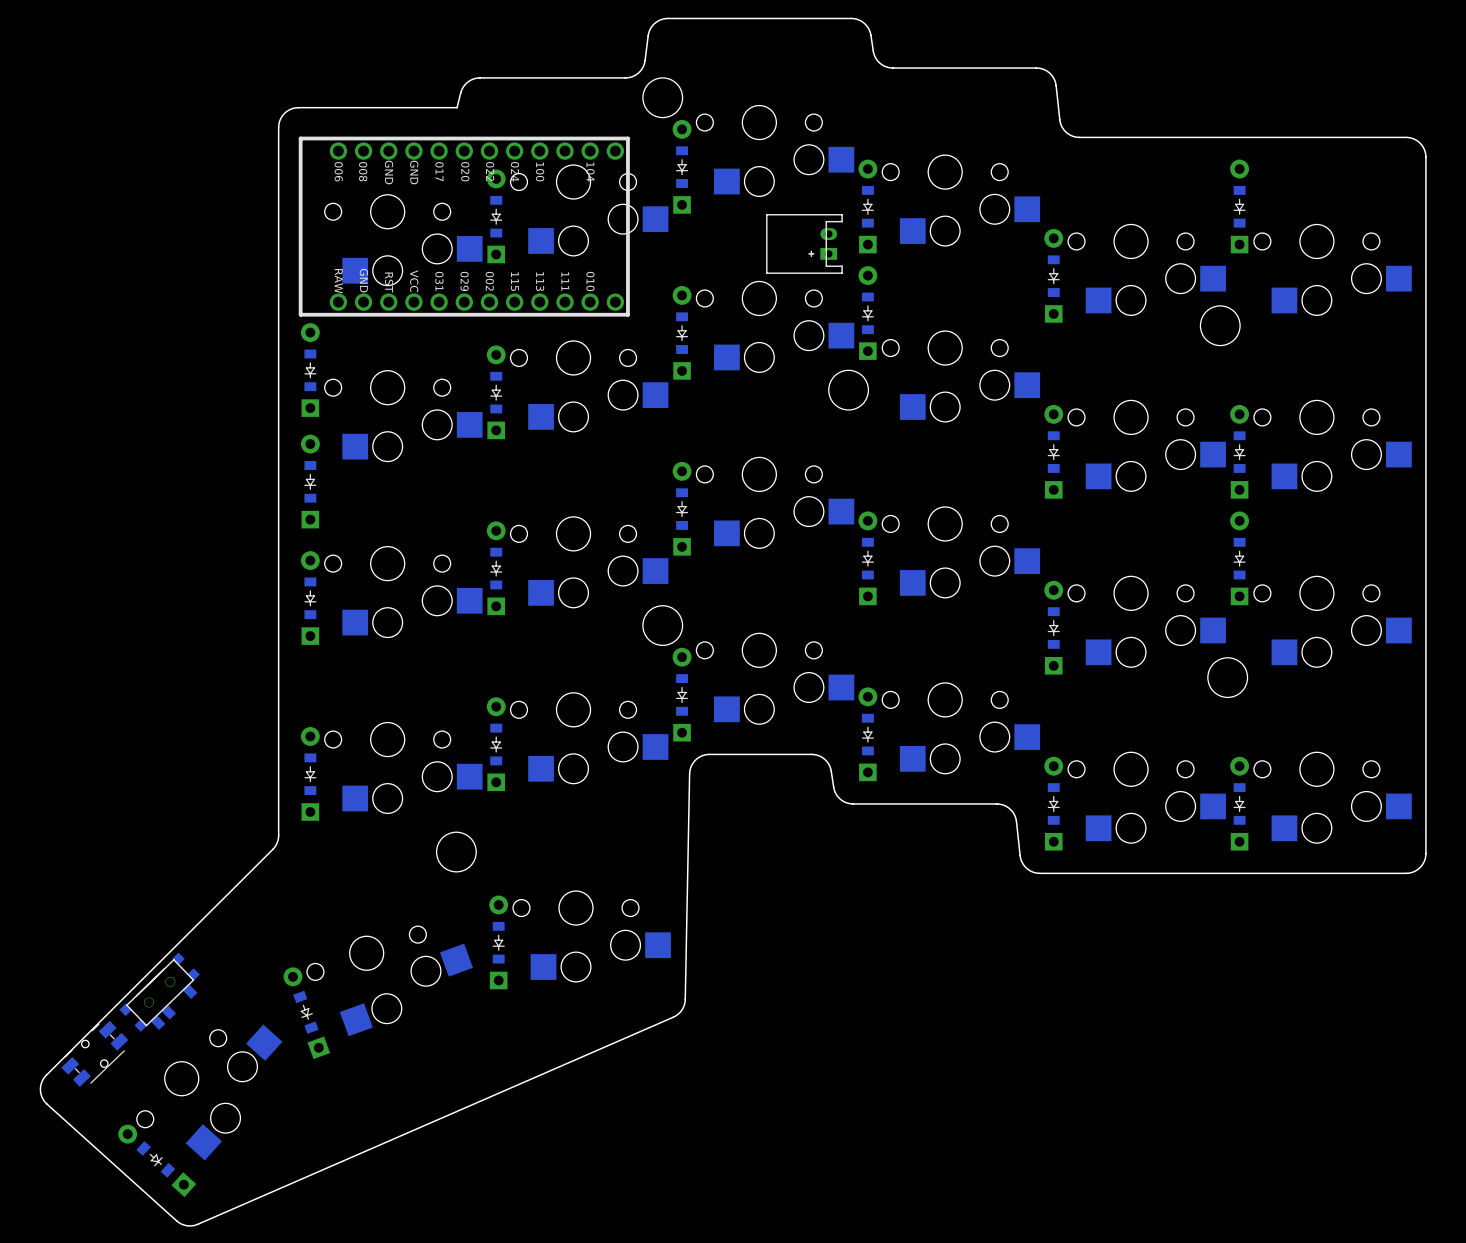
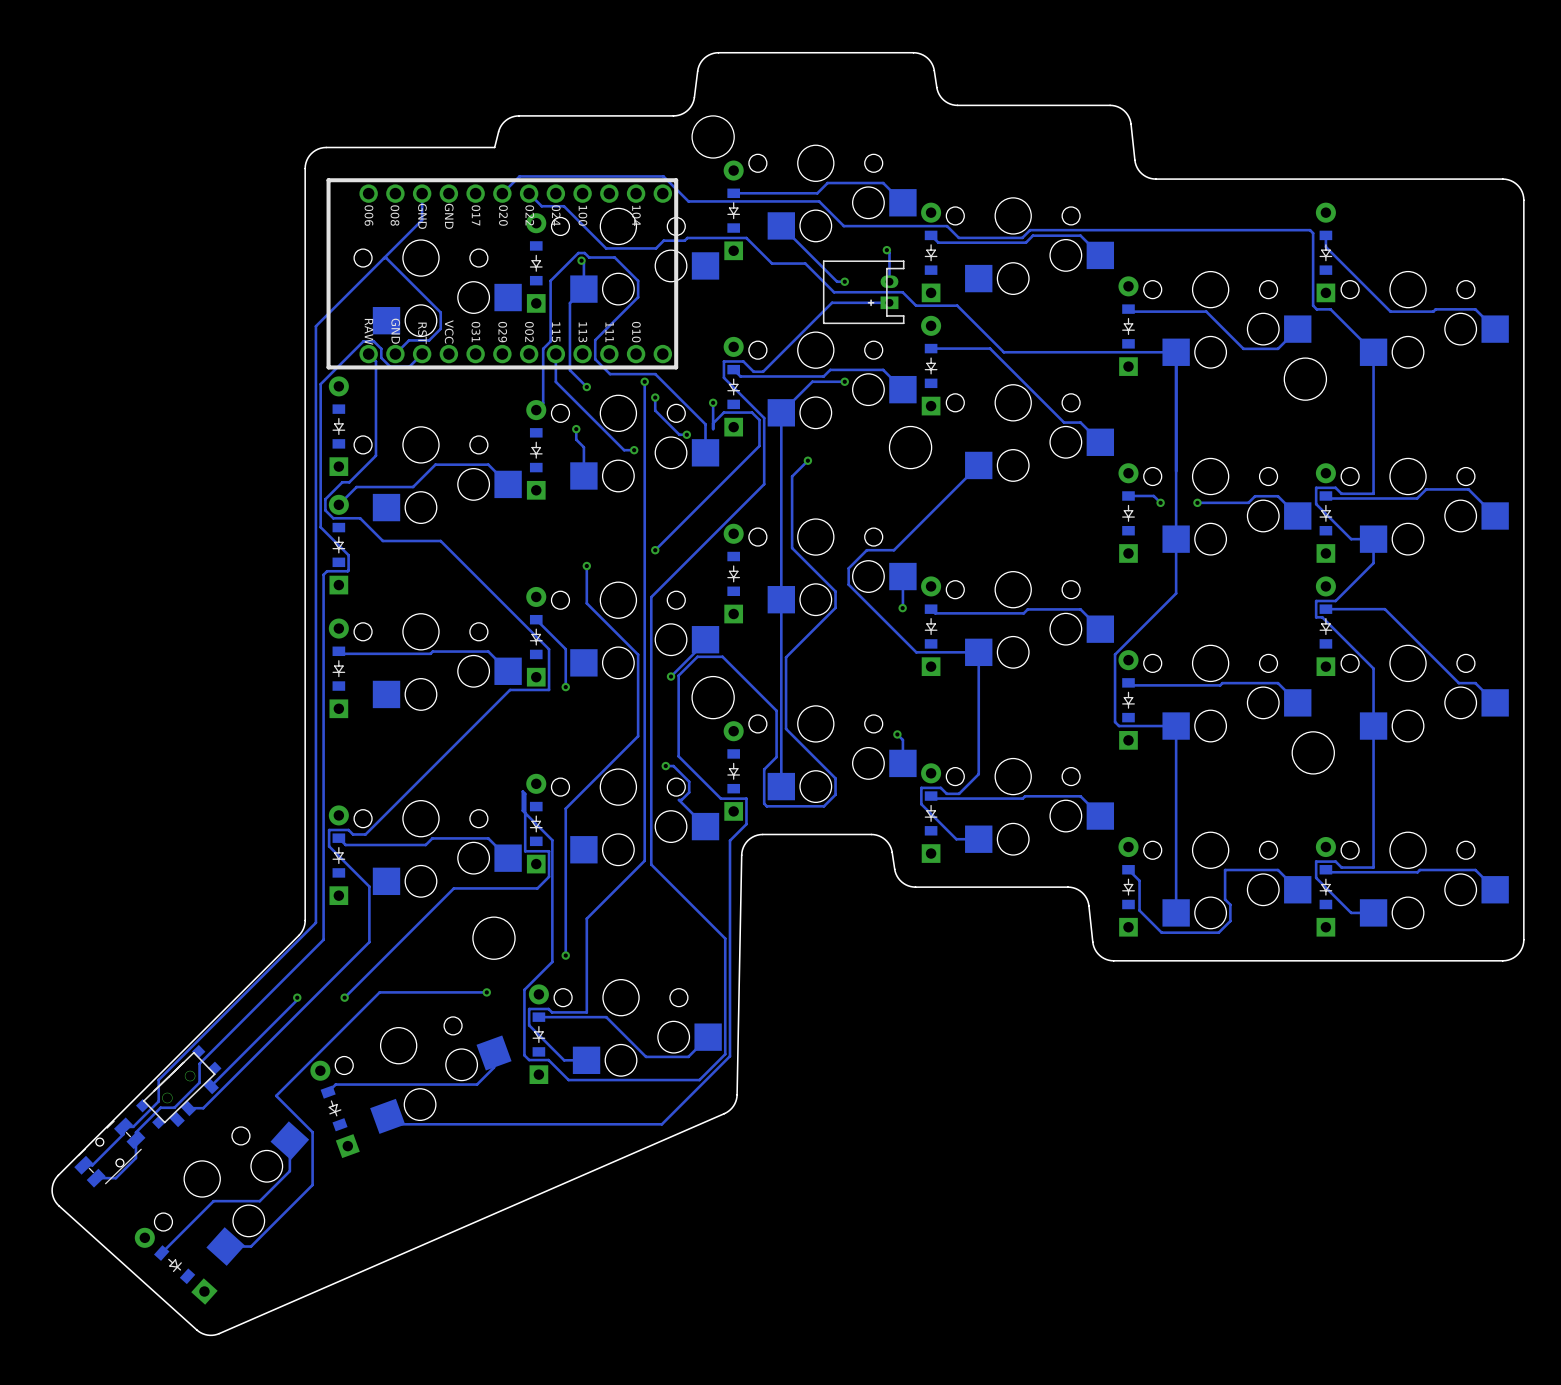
track: none -> (733, 193) (817, 193) (827, 183) (883, 183) (902, 202)
track: none -> (422, 193) (422, 220) (315, 326) (315, 922) (158, 1080) (158, 1101) (133, 1126) (123, 1126) (123, 1134) (92, 1165) (83, 1165)
track: none -> (502, 193) (519, 176) (663, 176) (688, 201) (819, 201) (843, 226) (947, 226) (958, 237) (1022, 237) (1030, 230) (1310, 230) (1313, 233) (1313, 305) (1316, 309) (1330, 309) (1373, 352) (1373, 493) (1341, 493) (1335, 487) (1316, 487) (1316, 504) (1351, 539) (1373, 539) (1373, 563) (1335, 601) (1316, 601) (1316, 617) (1322, 617) (1373, 668) (1373, 867) (1341, 867) (1335, 861) (1316, 861) (1316, 877) (1351, 912) (1373, 912)
track: none -> (529, 193) (541, 206) (563, 206) (606, 248) (655, 248) (663, 240) (684, 240) (687, 238) (746, 238) (772, 263) (805, 263) (834, 292) (902, 292) (916, 305) (957, 305) (1003, 352) (1176, 352) (1176, 593) (1115, 654) (1115, 722) (1119, 726) (1176, 726) (1176, 912)
track: none -> (781, 225) (837, 281) (844, 281)
track: none -> (931, 235) (938, 242) (1025, 242) (1032, 235) (1080, 235) (1100, 255)
track: none -> (1325, 235) (1325, 246) (1390, 311) (1475, 309) (1495, 329)
track: none -> (886, 250) (889, 252) (889, 281)
via: none -> (886, 250)
track: none -> (384, 258) (440, 312) (440, 328) (429, 340) (409, 340) (395, 354)
track: none -> (581, 260) (583, 263) (583, 289) (569, 303) (569, 370) (586, 387)
via: none -> (581, 260)
via: none -> (844, 281)
track: none -> (889, 302) (832, 302) (763, 371) (753, 371) (743, 361) (723, 361) (723, 377) (764, 418) (764, 484) (651, 597) (651, 864) (725, 938) (725, 1054) (699, 1080) (568, 1080) (548, 1060) (529, 1060) (524, 1055) (524, 989) (552, 961) (552, 840) (522, 810) (522, 791) (525, 793) (525, 851) (549, 851) (549, 876) (537, 888) (453, 888) (344, 997)
track: none -> (1128, 309) (1131, 311) (1206, 311) (1243, 348) (1278, 348) (1297, 329)
track: none -> (931, 348) (990, 348) (1064, 422) (1080, 422) (1100, 442)
track: none -> (368, 354) (375, 361) (375, 455) (349, 482) (342, 482) (325, 499) (325, 510) (333, 518) (360, 518) (382, 541) (440, 541) (549, 649) (549, 689) (510, 689) (365, 834) (353, 834) (348, 830) (329, 830) (329, 846) (369, 886) (369, 942) (203, 1108) (188, 1108)
track: none -> (422, 354) (409, 366) (390, 366) (381, 357) (381, 348) (373, 341) (363, 341) (320, 384) (320, 527) (348, 555) (347, 571) (327, 571) (323, 574) (323, 939) (199, 1063) (199, 1082) (174, 1107) (160, 1107) (135, 1132) (135, 1158) (115, 1178) (96, 1178)
track: none -> (555, 354) (555, 381) (624, 450) (634, 450)
track: none -> (733, 369) (740, 376) (823, 376) (830, 369) (883, 369) (902, 389)
track: none -> (644, 381) (644, 860) (586, 918) (586, 1012) (552, 1012) (548, 1008) (529, 1008) (529, 1025) (564, 1060) (586, 1060)
via: none -> (644, 381)
track: none -> (844, 381) (812, 381) (781, 412) (781, 786)
via: none -> (844, 381)
via: none -> (586, 387)
track: none -> (655, 397) (655, 410) (679, 434) (686, 434)
via: none -> (655, 397)
track: none -> (713, 402) (713, 429)
via: none -> (713, 402)
track: none -> (536, 410) (543, 403) (543, 348) (550, 341) (550, 280) (578, 253) (584, 253) (589, 257) (614, 257) (638, 280) (638, 297) (595, 340) (595, 359) (610, 374) (655, 374) (705, 424) (705, 452)
track: none -> (713, 423) (723, 412) (751, 412) (759, 420) (759, 445) (655, 550)
track: none -> (576, 429) (576, 439) (583, 447) (583, 475)
via: none -> (576, 429)
via: none -> (686, 434)
via: none -> (634, 450)
track: none -> (807, 460) (792, 476) (792, 548) (835, 591) (835, 607) (786, 657) (786, 728) (835, 778) (835, 794) (823, 806) (766, 806) (764, 803) (764, 769) (776, 757) (776, 710) (722, 656) (697, 656) (678, 675) (678, 756) (720, 798) (746, 798) (746, 824) (729, 840) (729, 1056) (661, 1124) (395, 1124) (387, 1116)
via: none -> (807, 460)
track: none -> (978, 465) (893, 550) (866, 550) (848, 568) (848, 584) (916, 652) (978, 652) (978, 774) (959, 793) (946, 793) (940, 787) (921, 787) (921, 804) (956, 839) (978, 839)
track: none -> (508, 484) (488, 464) (435, 464) (413, 487) (356, 487) (338, 504)
track: none -> (1128, 495) (1153, 495) (1160, 502)
track: none -> (1325, 495) (1328, 498) (1417, 498) (1426, 489) (1468, 489) (1495, 515)
via: none -> (1160, 502)
track: none -> (1197, 502) (1248, 502) (1255, 496) (1278, 496) (1297, 515)
via: none -> (1197, 502)
via: none -> (655, 550)
track: none -> (586, 566) (586, 603) (638, 654) (638, 736) (565, 808) (565, 955)
via: none -> (586, 566)
track: none -> (902, 576) (902, 608)
via: none -> (902, 608)
track: none -> (931, 609) (935, 613) (1023, 613) (1027, 609) (1080, 609) (1100, 629)
track: none -> (1325, 609) (1384, 609) (1458, 683) (1475, 683) (1495, 702)
track: none -> (536, 619) (565, 649) (565, 687)
track: none -> (705, 639) (705, 642) (671, 676)
track: none -> (338, 651) (341, 653) (488, 651) (508, 671)
via: none -> (671, 676)
track: none -> (1128, 682) (1131, 685) (1278, 683) (1297, 702)
via: none -> (565, 687)
track: none -> (897, 734) (902, 739) (902, 763)
via: none -> (897, 734)
track: none -> (665, 766) (673, 766) (689, 781) (689, 792) (681, 800) (678, 800) (705, 826)
via: none -> (665, 766)
track: none -> (931, 796) (933, 798) (1080, 796) (1100, 816)
track: none -> (338, 838) (345, 845) (425, 845) (432, 838) (488, 838) (508, 858)
track: none -> (1128, 869) (1139, 880) (1139, 910) (1161, 932) (1218, 932) (1230, 921) (1230, 904) (1225, 899) (1225, 870) (1278, 870) (1297, 889)
track: none -> (1325, 869) (1328, 872) (1475, 870) (1495, 889)
via: none -> (565, 955)
track: none -> (486, 992) (379, 992) (276, 1095) (312, 1132) (312, 1184) (251, 1246) (225, 1246)
via: none -> (486, 992)
track: none -> (297, 997) (297, 999) (210, 1086)
via: none -> (297, 997)
via: none -> (344, 997)
track: none -> (538, 1017) (606, 1017) (646, 1056) (688, 1056) (708, 1037)
track: none -> (494, 1053) (494, 1067) (477, 1084) (335, 1084) (328, 1092)
track: none -> (289, 1140) (289, 1171) (259, 1201) (213, 1201) (161, 1253)

